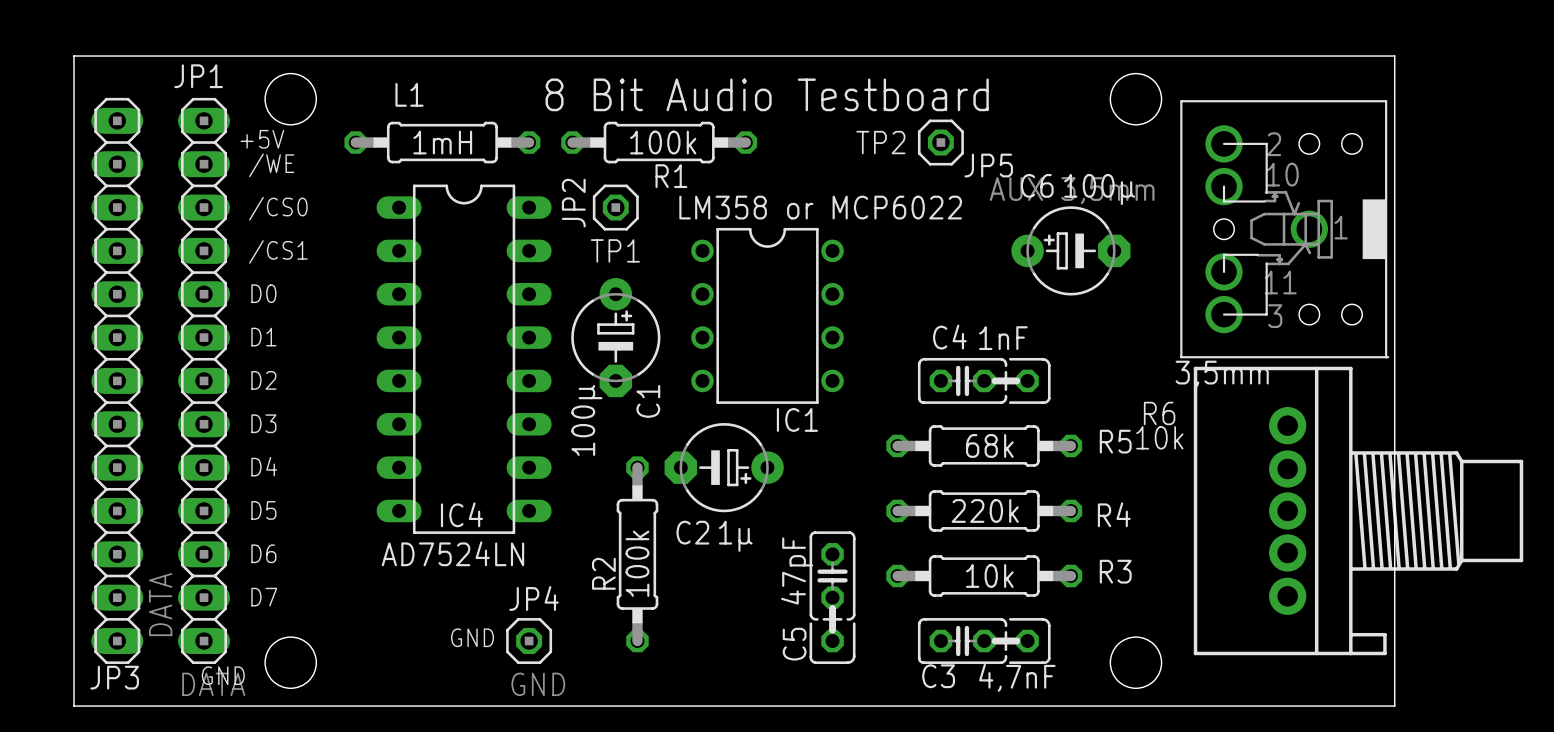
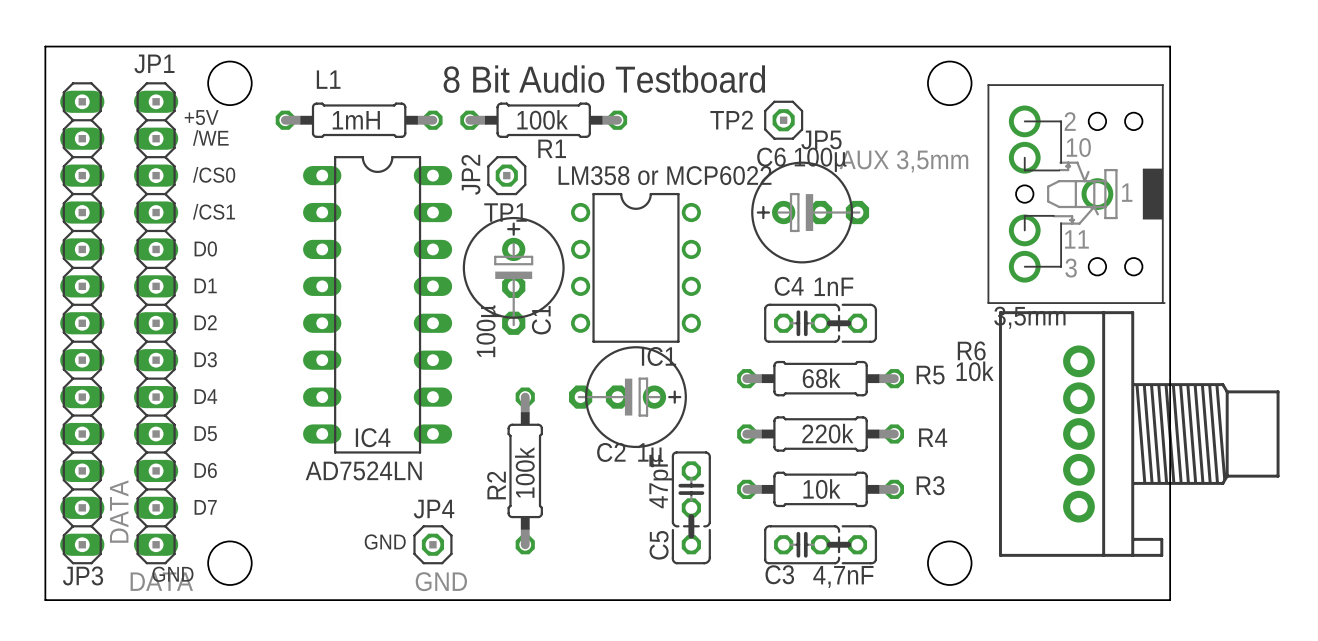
C6 footprint: [1011, 206, 1131, 296] -> [751, 161, 870, 264]
C1 footprint: [571, 277, 661, 398] -> [462, 216, 565, 335]
C2 footprint: [664, 422, 784, 513] -> [568, 346, 687, 449]

